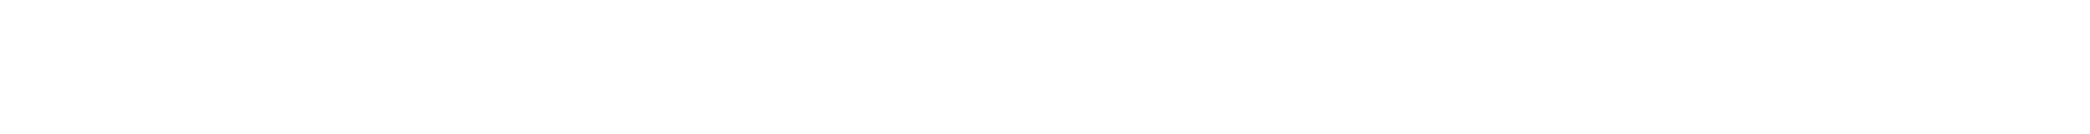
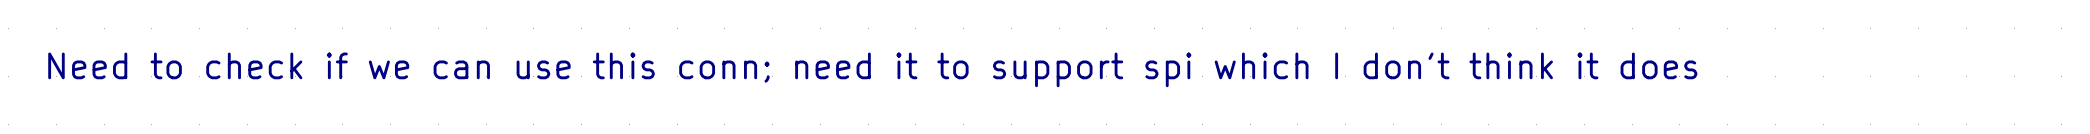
text: none -> Need to check if we can use this conn; need it to support spi which I don't think it does (872, 69)

